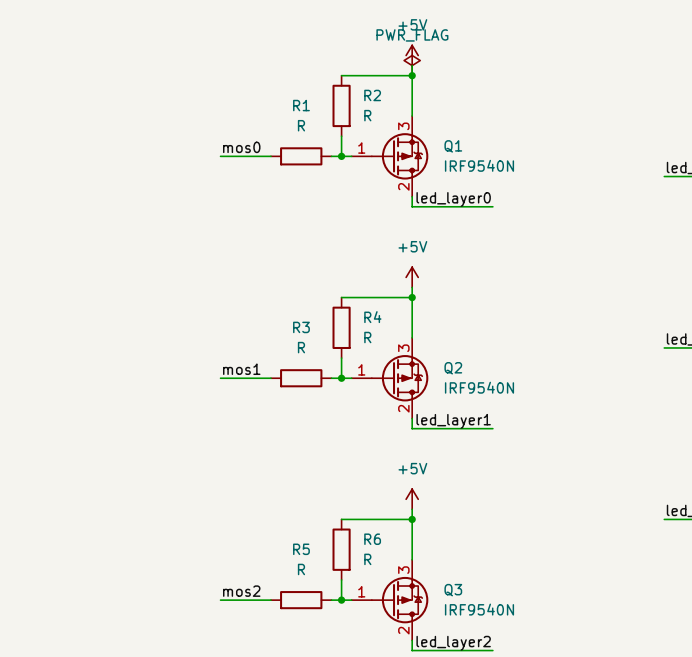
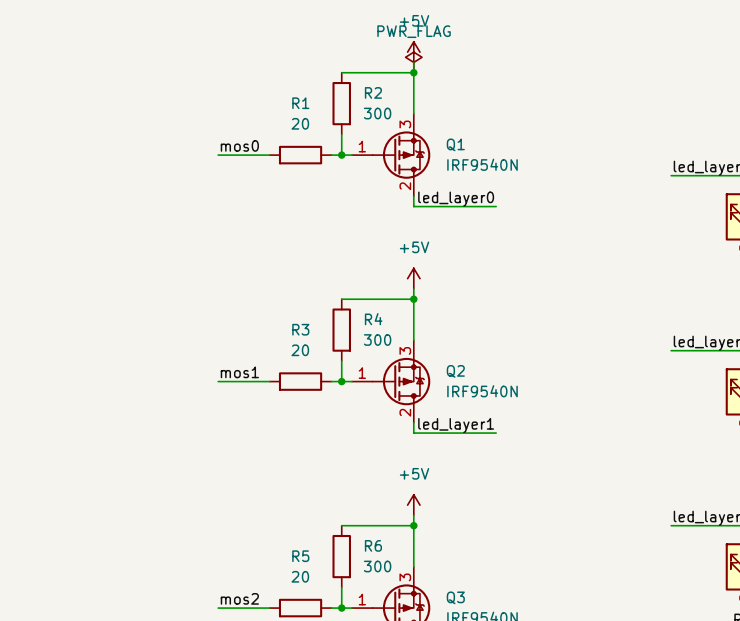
R2 value: R (367, 115) -> 300 (377, 113)
R1 value: R (301, 125) -> 20 (300, 123)
R4 value: R (367, 337) -> 300 (377, 340)
R3 value: R (301, 347) -> 20 (300, 350)
R6 value: R (367, 559) -> 300 (377, 566)
R5 value: R (301, 569) -> 20 (300, 576)

